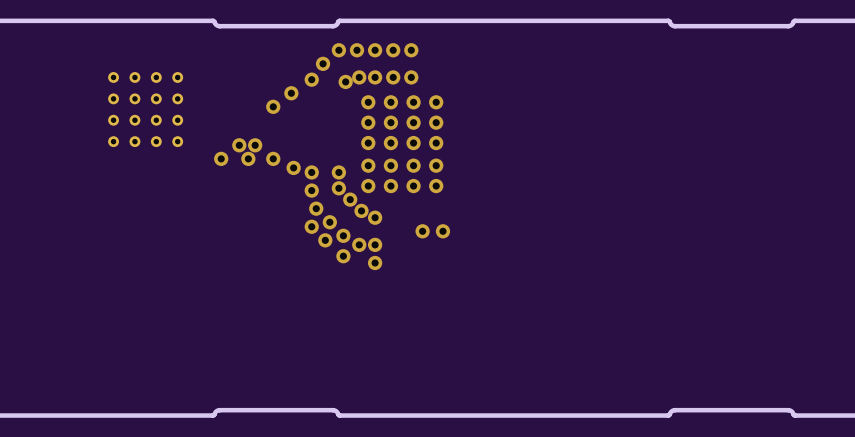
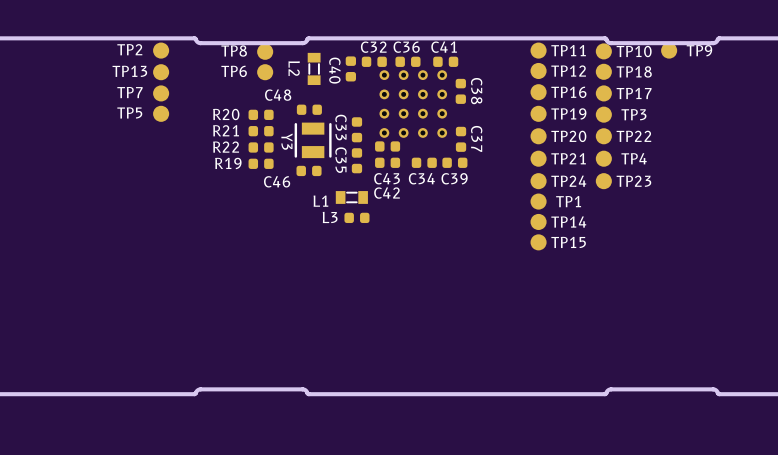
TP2: none -> (161, 50)
TP11: none -> (538, 50)
TP9: none -> (669, 50)
TP8: none -> (265, 51)
TP10: none -> (603, 51)
C32: none -> (374, 61)
C36: none -> (407, 61)
C41: none -> (445, 61)
via: (338, 50) -> none
via: (356, 50) -> none
via: (375, 50) -> none
via: (393, 50) -> none
via: (411, 50) -> none
L2: none -> (314, 68)
C40: none -> (350, 68)
TP12: none -> (538, 70)
TP18: none -> (603, 71)
TP13: none -> (161, 72)
TP6: none -> (265, 72)
via: (323, 63) -> none
via: (359, 77) -> none
via: (375, 77) -> none
via: (393, 77) -> none
via: (411, 77) -> none
via: (311, 79) -> none
C38: none -> (460, 91)
TP16: none -> (538, 92)
TP7: none -> (161, 93)
via: (345, 81) -> none
TP17: none -> (603, 93)
via: (291, 93) -> none
C48: none -> (309, 109)
via: (368, 102) -> none
via: (390, 102) -> none
via: (413, 102) -> none
via: (436, 102) -> none
TP5: none -> (161, 113)
TP19: none -> (538, 113)
R20: none -> (261, 114)
TP3: none -> (603, 114)
via: (273, 106) -> none
part position: (145, 109) -> (413, 104)
via: (368, 122) -> none
via: (390, 122) -> none
C33: none -> (356, 129)
via: (413, 122) -> none
via: (436, 122) -> none
R21: none -> (261, 131)
TP20: none -> (538, 136)
TP22: none -> (603, 136)
C37: none -> (461, 139)
Y3: none -> (313, 140)
C43: none -> (387, 146)
R22: none -> (261, 147)
via: (368, 143) -> none
via: (390, 143) -> none
via: (413, 143) -> none
via: (436, 143) -> none
via: (239, 145) -> none
via: (255, 145) -> none
TP21: none -> (538, 158)
TP4: none -> (603, 158)
C35: none -> (356, 160)
via: (221, 158) -> none
via: (248, 158) -> none
via: (273, 158) -> none
C42: none -> (387, 162)
C34: none -> (424, 162)
C39: none -> (454, 162)
R19: none -> (261, 163)
via: (368, 165) -> none
via: (390, 165) -> none
via: (413, 165) -> none
via: (436, 165) -> none
via: (293, 167) -> none
C46: none -> (309, 170)
via: (311, 172) -> none
via: (338, 172) -> none
TP24: none -> (538, 181)
TP23: none -> (603, 181)
via: (368, 186) -> none
via: (390, 186) -> none
via: (413, 186) -> none
via: (436, 186) -> none
via: (338, 188) -> none
via: (311, 190) -> none
L1: none -> (351, 197)
via: (350, 199) -> none
TP1: none -> (538, 201)
via: (316, 208) -> none
via: (361, 210) -> none
via: (375, 217) -> none
L3: none -> (356, 217)
via: (329, 222) -> none
TP14: none -> (538, 221)
via: (311, 226) -> none
via: (422, 231) -> none
via: (442, 231) -> none
via: (343, 235) -> none
via: (325, 240) -> none
via: (359, 244) -> none
via: (375, 244) -> none
TP15: none -> (538, 242)
via: (343, 256) -> none
via: (375, 262) -> none

